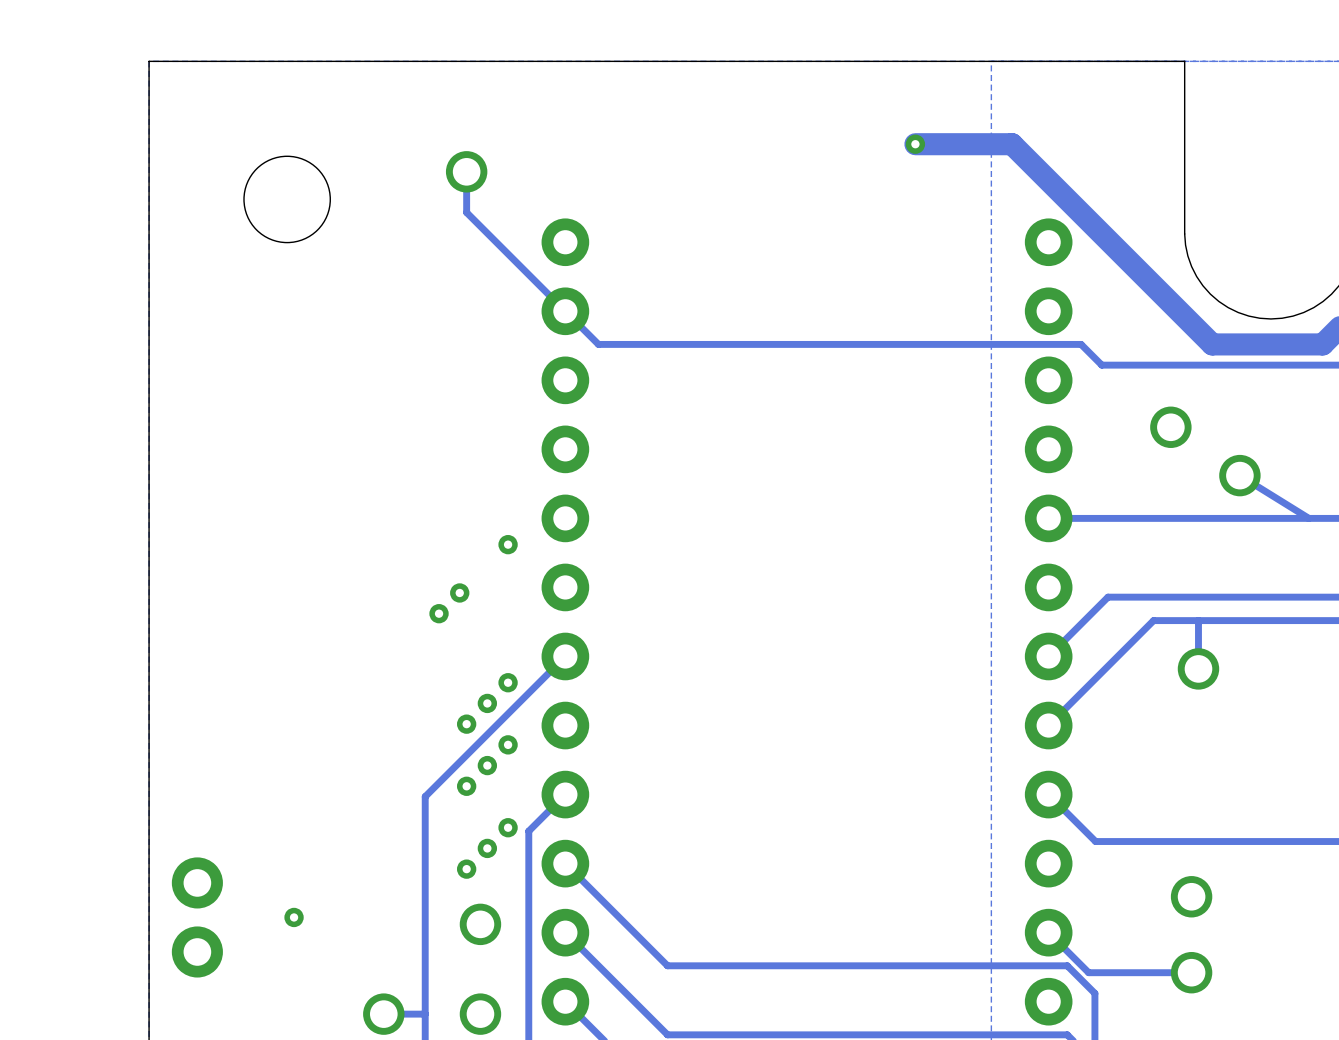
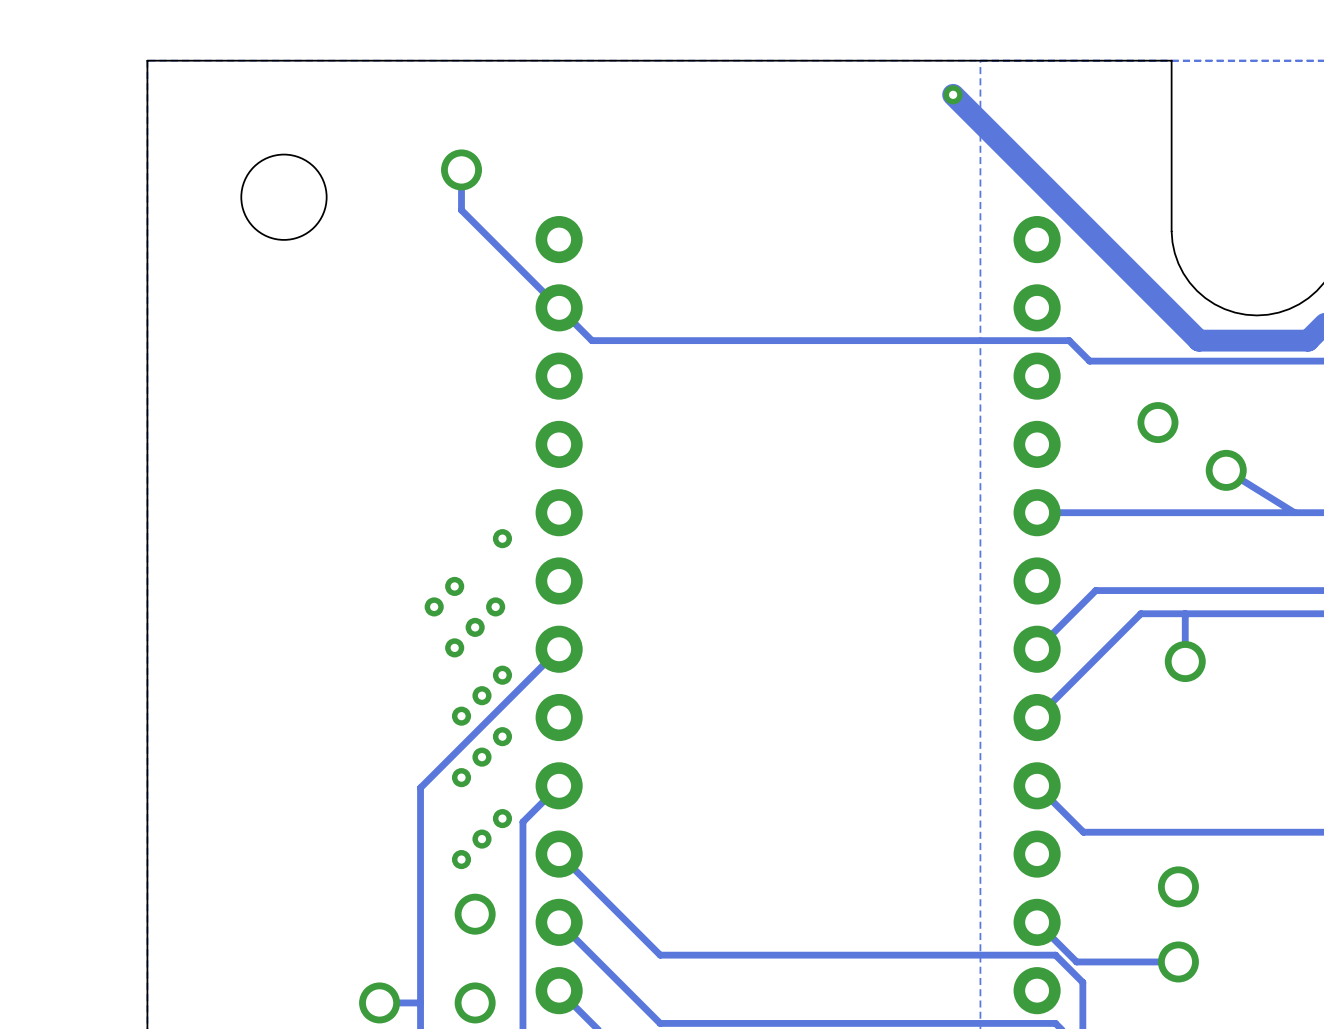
via position: (915, 144) -> (953, 94)
track: (1012, 144) (915, 144) -> (1000, 142) (953, 94)
via: none -> (495, 606)
via: none -> (475, 627)
via: none -> (454, 647)
part: (197, 917) -> none
via: (294, 917) -> none

